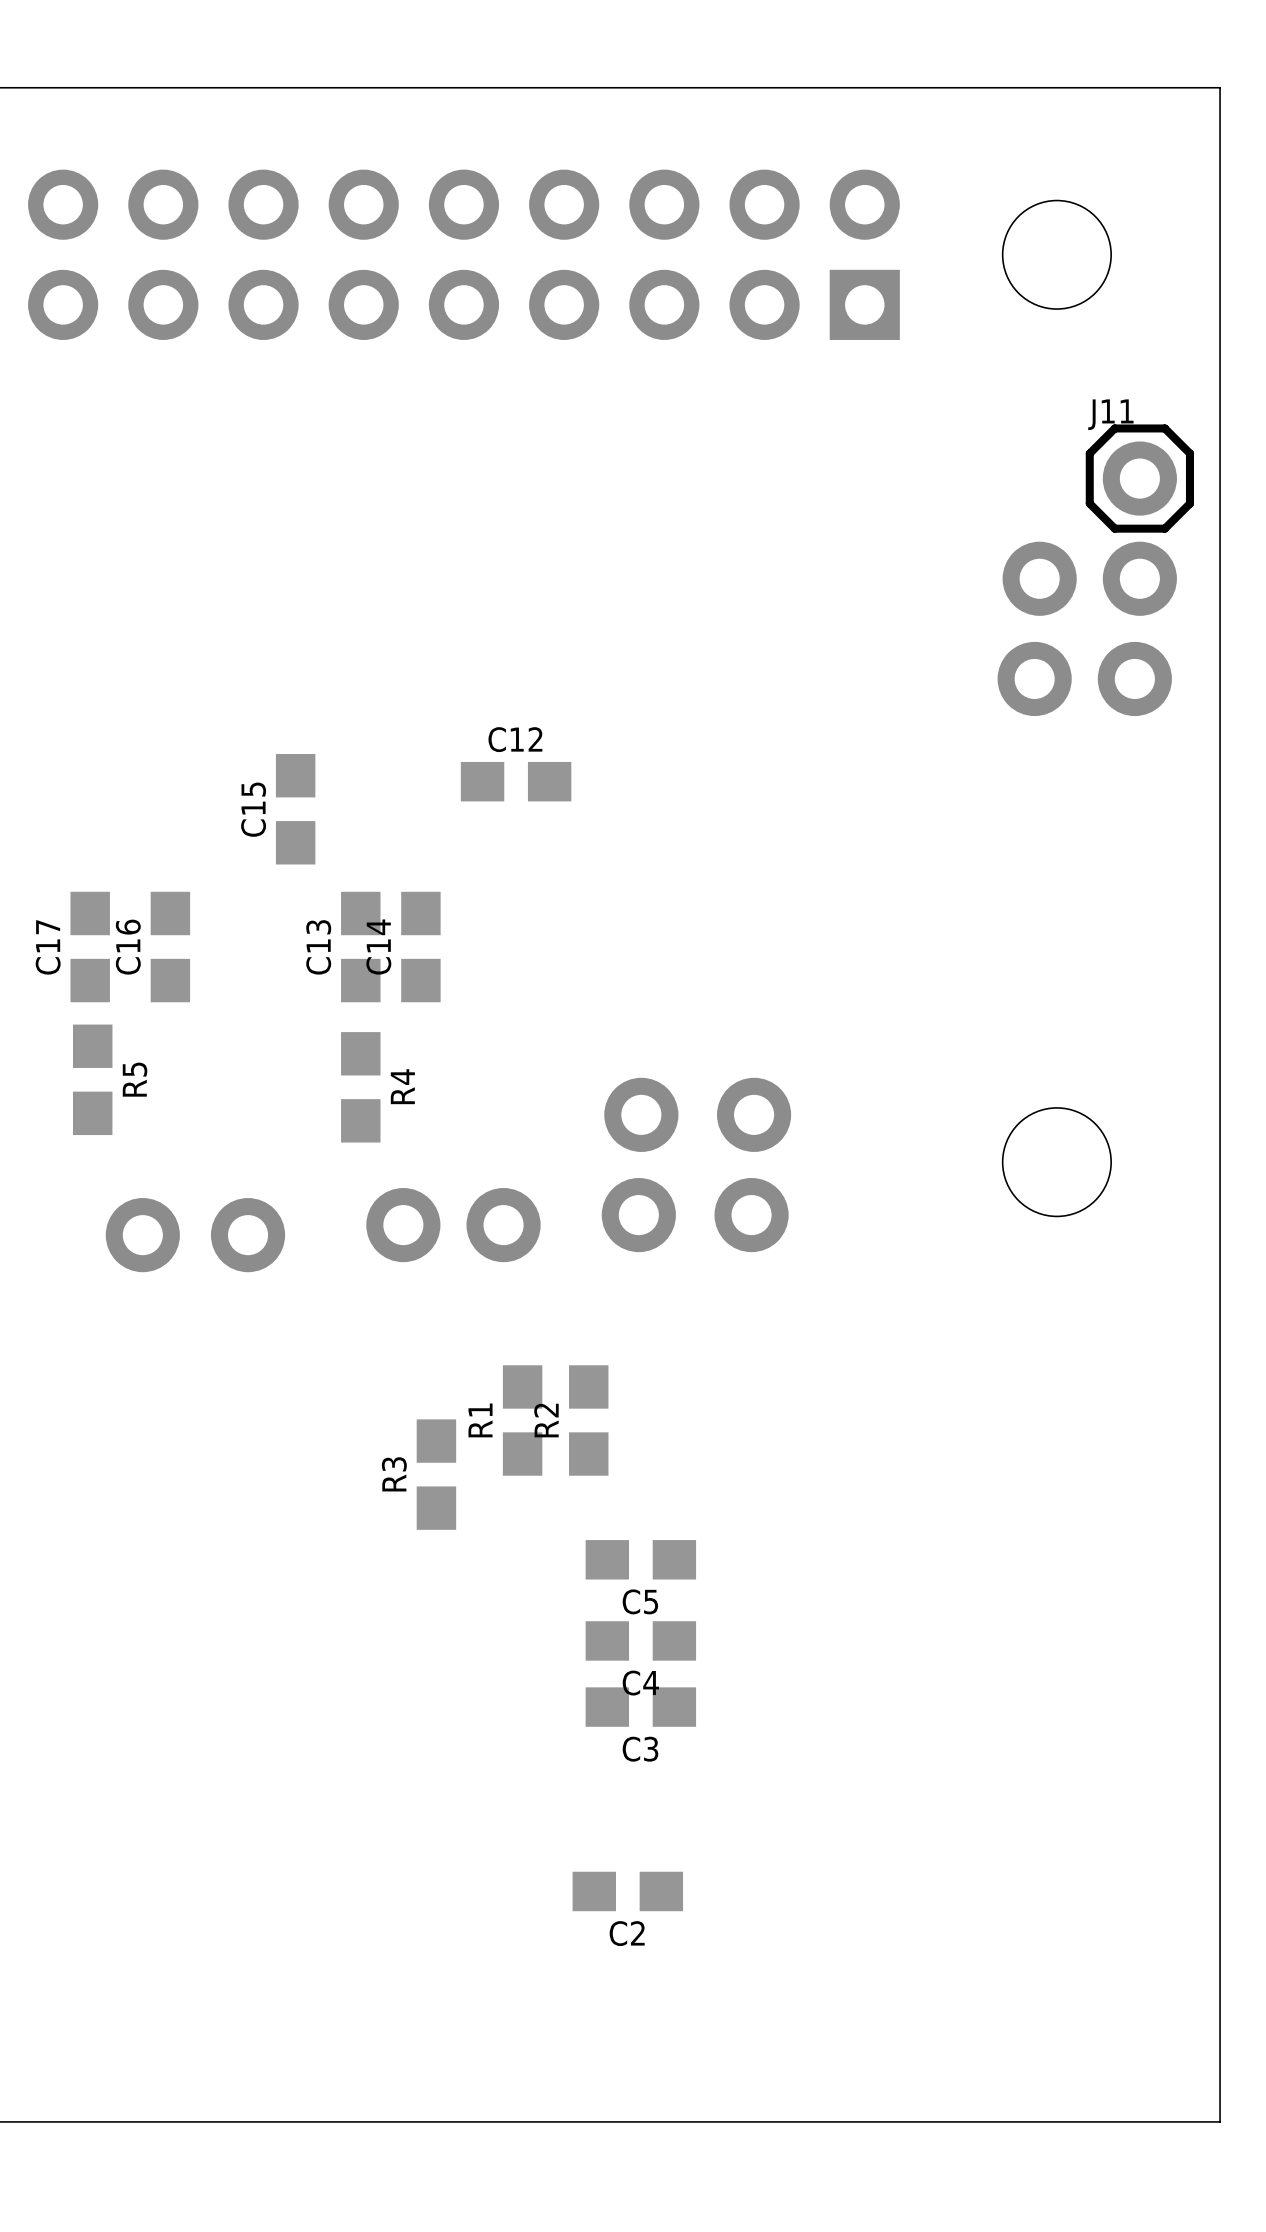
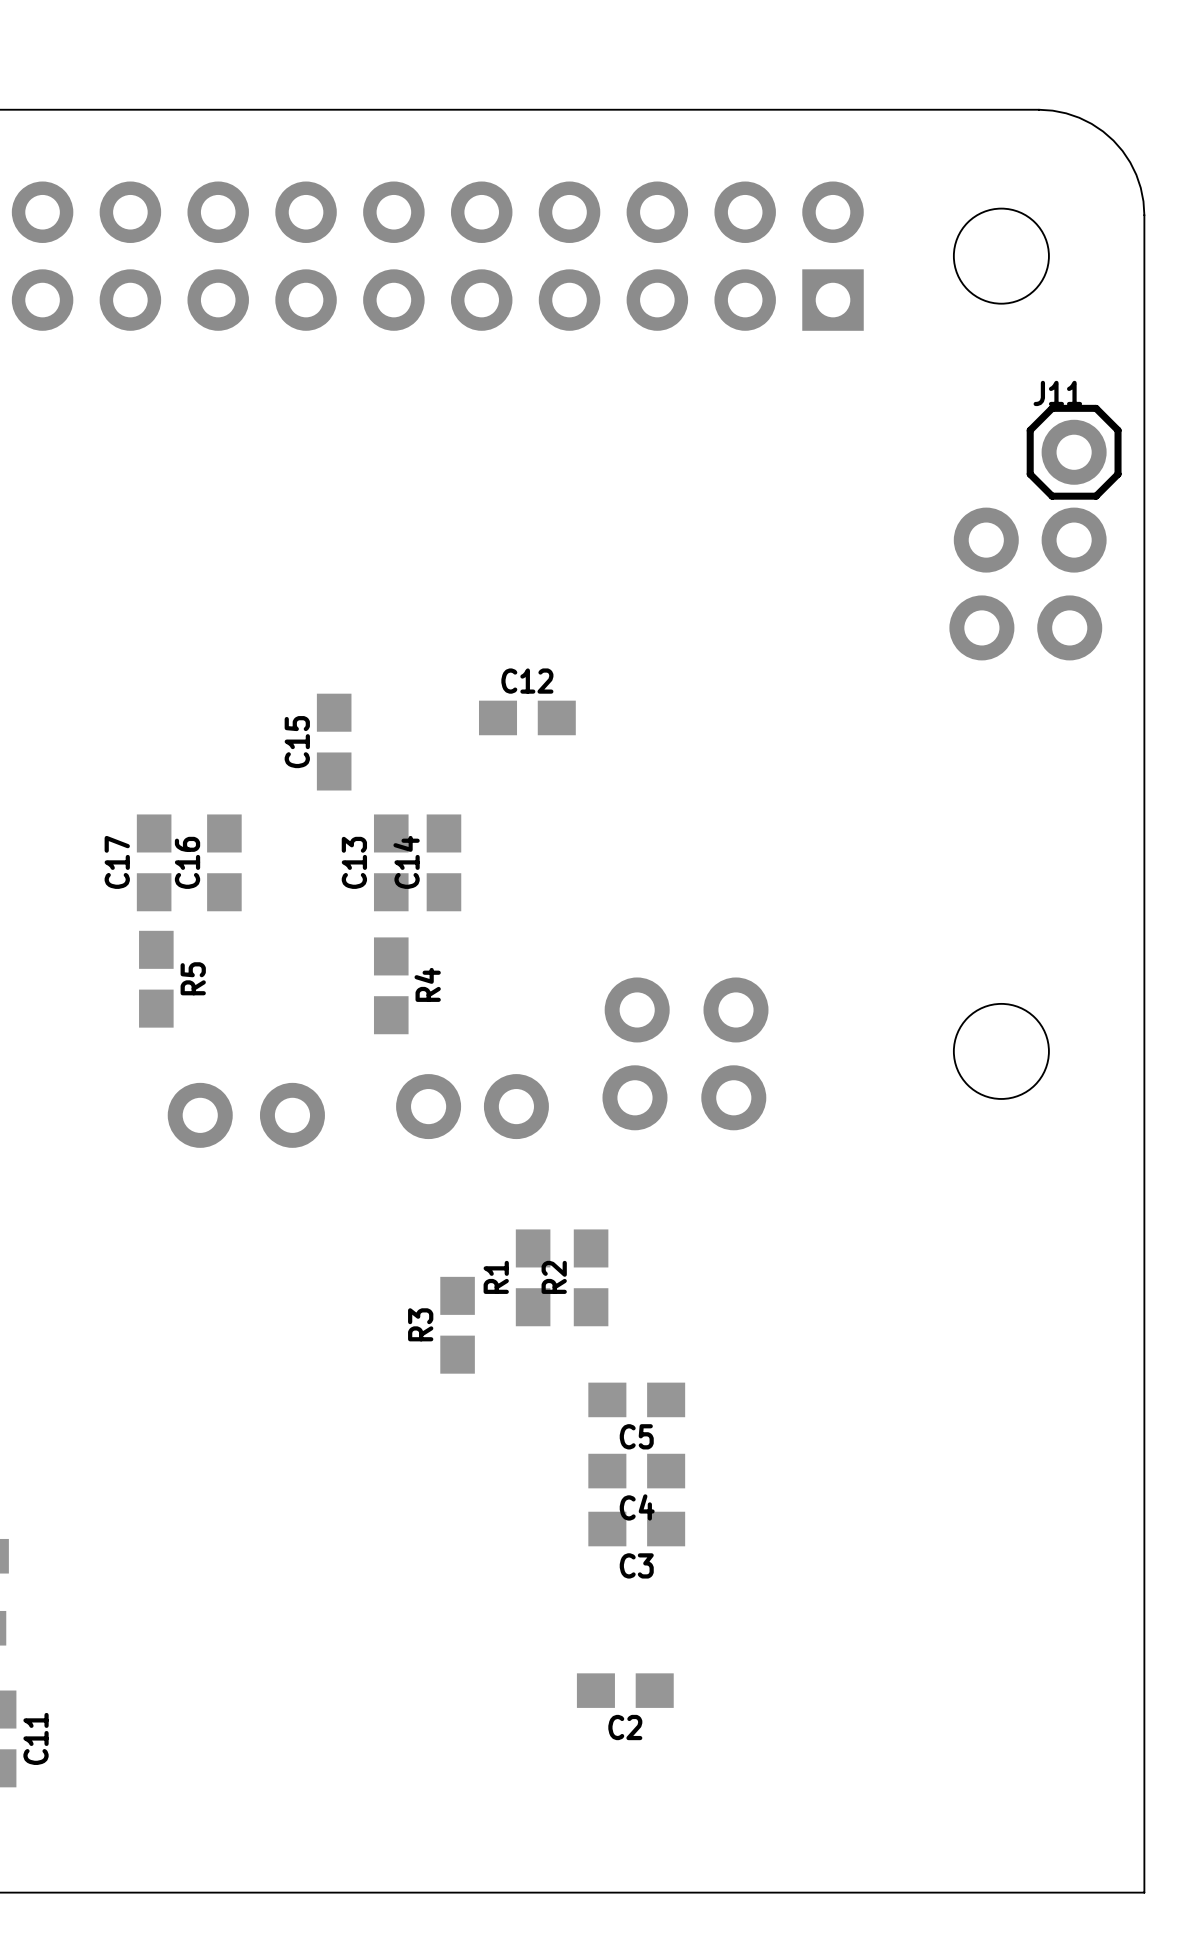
board edge: (1099, 87) (1220, 87) (1220, 208) -> (1038, 109) (1052, 110) (1079, 117) (1091, 123) (1113, 140) (1130, 162) (1136, 174) (1143, 201) (1144, 215)

